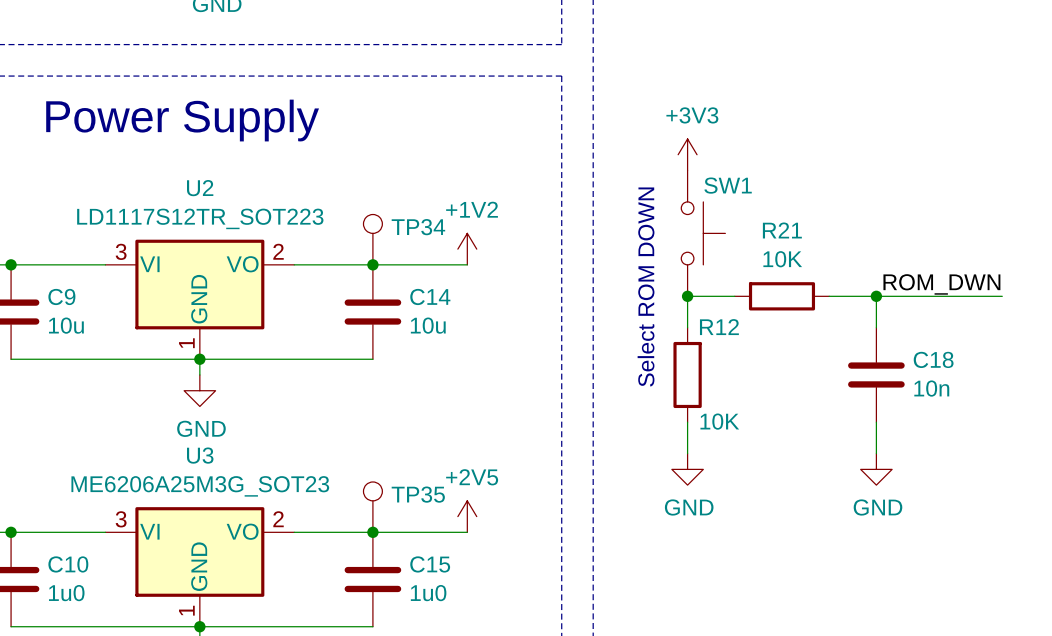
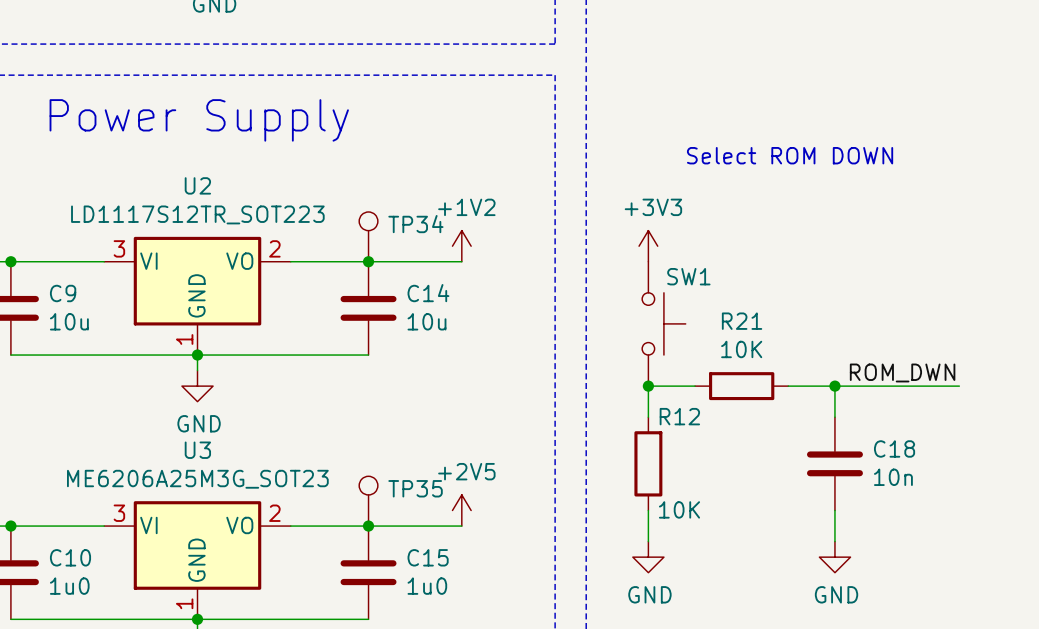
power symbol position: +3V3 (687, 154) -> +3V3 (648, 246)
text: none -> Select ROM DOWN (790, 155)
SW1 position: (703, 233) -> (663, 323)
label position: ROM_DWN (941, 284) -> ROM_DWN (902, 372)
text: Select ROM DOWN (646, 287) -> none
junction: (687, 296) -> none
wire: (734, 296) (687, 296) (687, 327) -> (695, 386) (648, 386) (648, 417)
R21 position: (781, 296) -> (741, 386)
wire: (829, 296) (1002, 296) -> (788, 386) (959, 386)
wire: (876, 296) (876, 327) -> (834, 386) (834, 417)
junction: (876, 296) -> none
R12 position: (687, 374) -> (648, 463)
C18 position: (876, 374) -> (834, 463)
junction: none -> (648, 386)
junction: none -> (834, 386)
wire: (687, 422) (687, 453) -> (648, 510) (648, 541)
wire: (876, 422) (876, 453) -> (834, 510) (834, 541)
power symbol: GND (687, 469) -> none
power symbol: GND (876, 469) -> none
power symbol: none -> GND (648, 557)
power symbol: none -> GND (834, 557)

